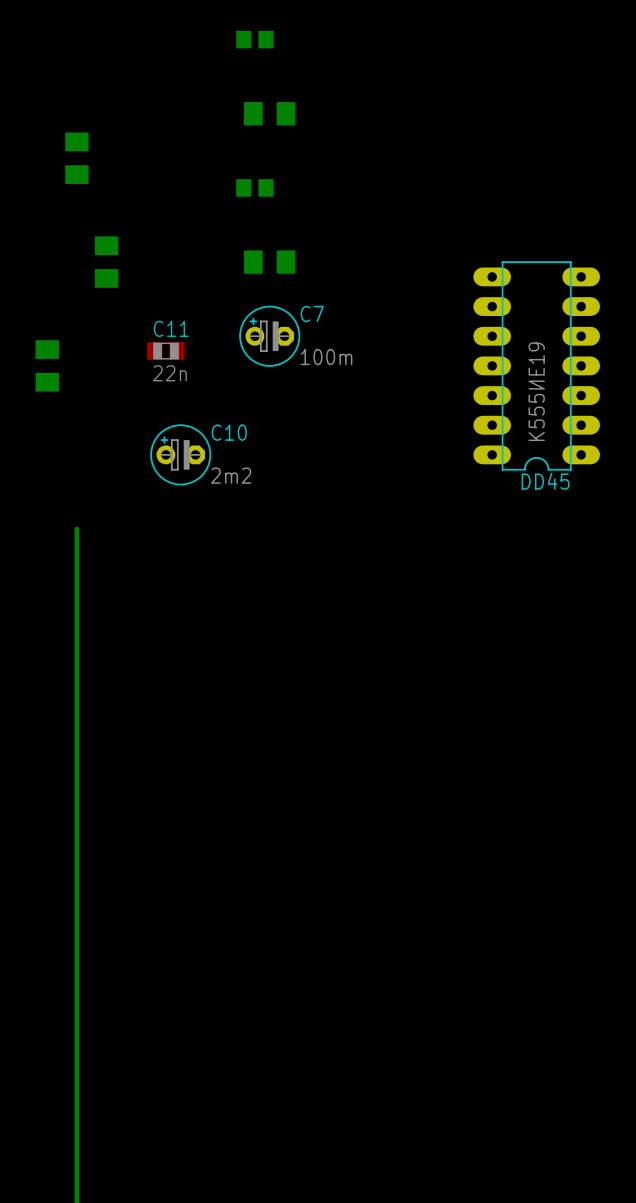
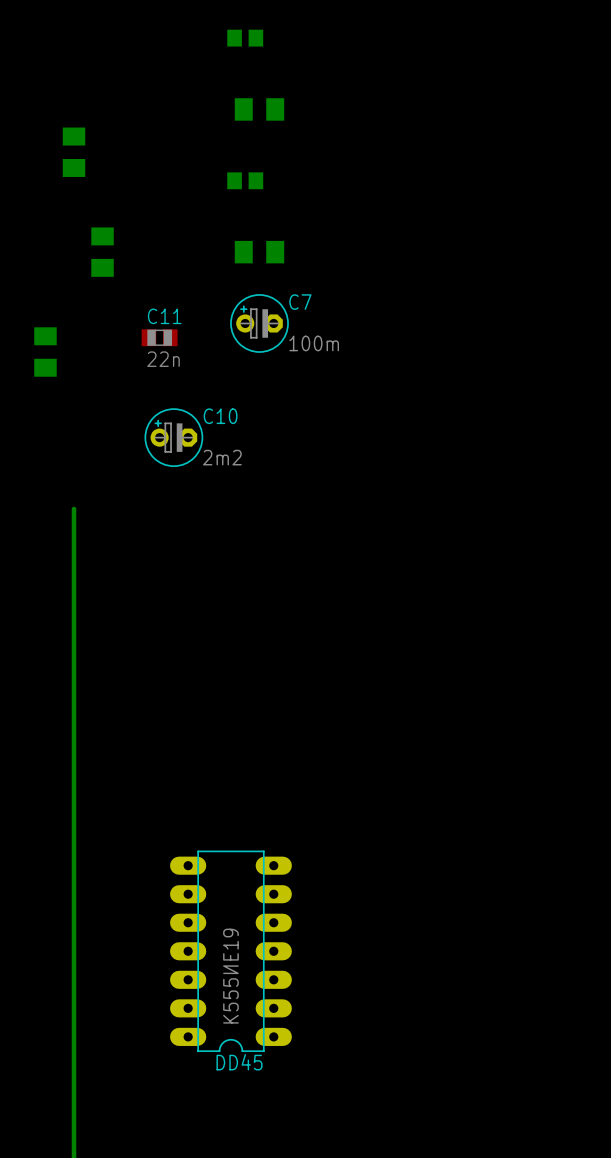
DD45 position: (536, 365) -> (230, 951)

